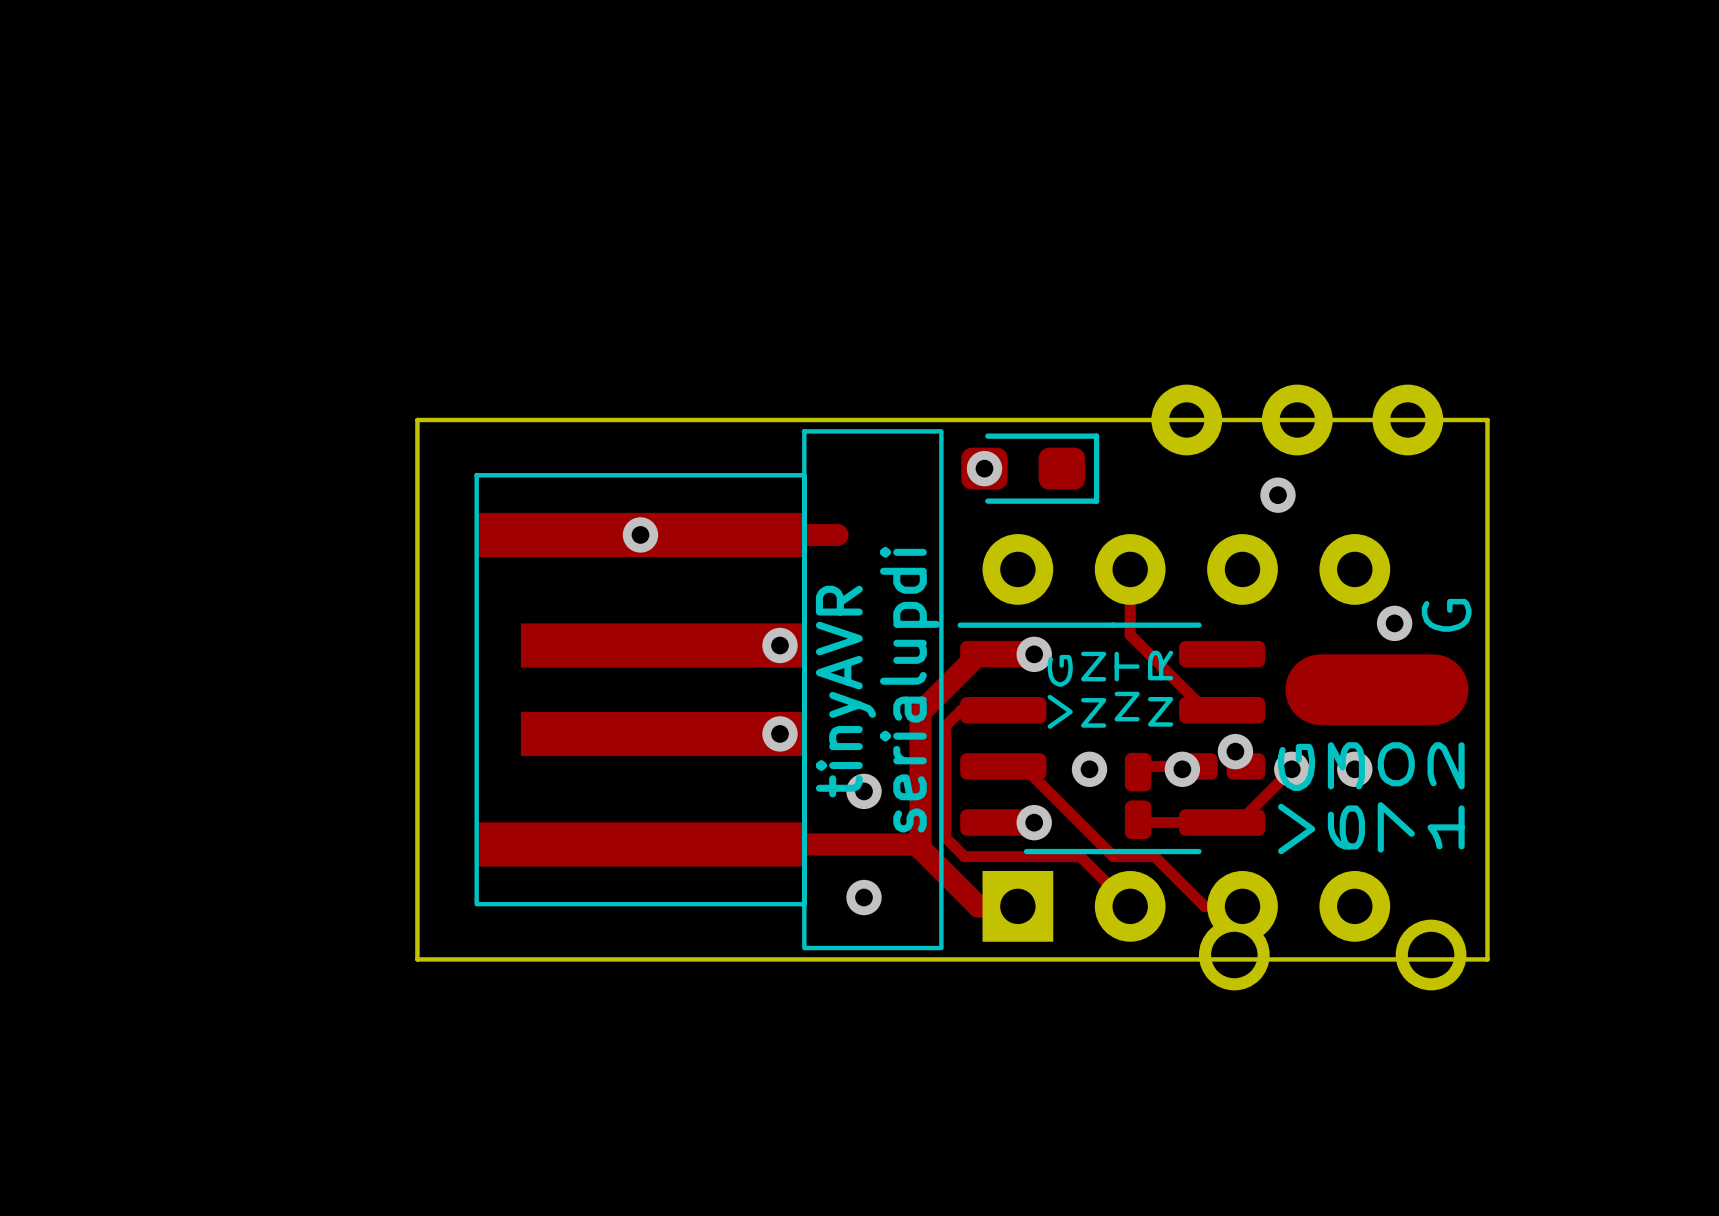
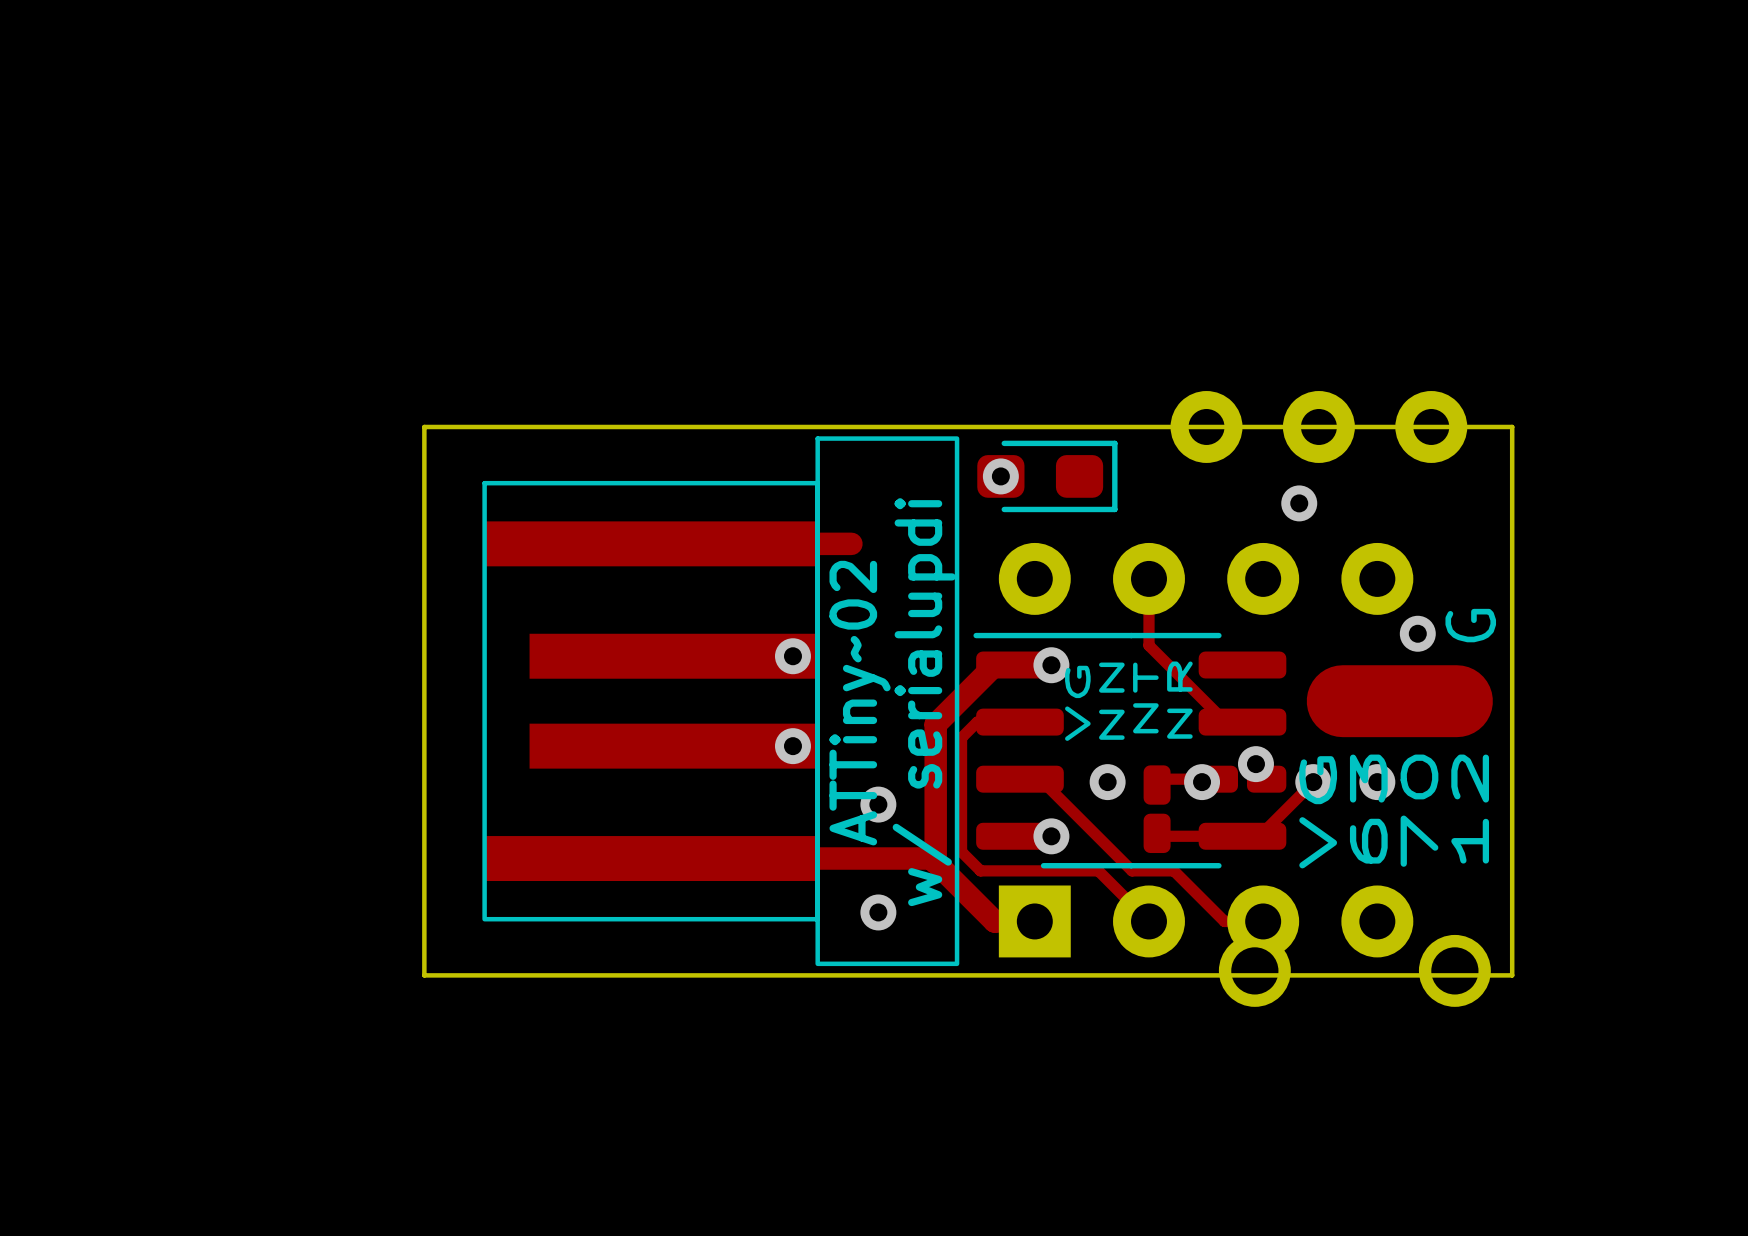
via: (640, 534) -> none
text: serialupdi (910, 689) -> w/ serialupdi (924, 702)
text: tinyAVR (845, 691) -> ATTiny~02 (860, 703)

